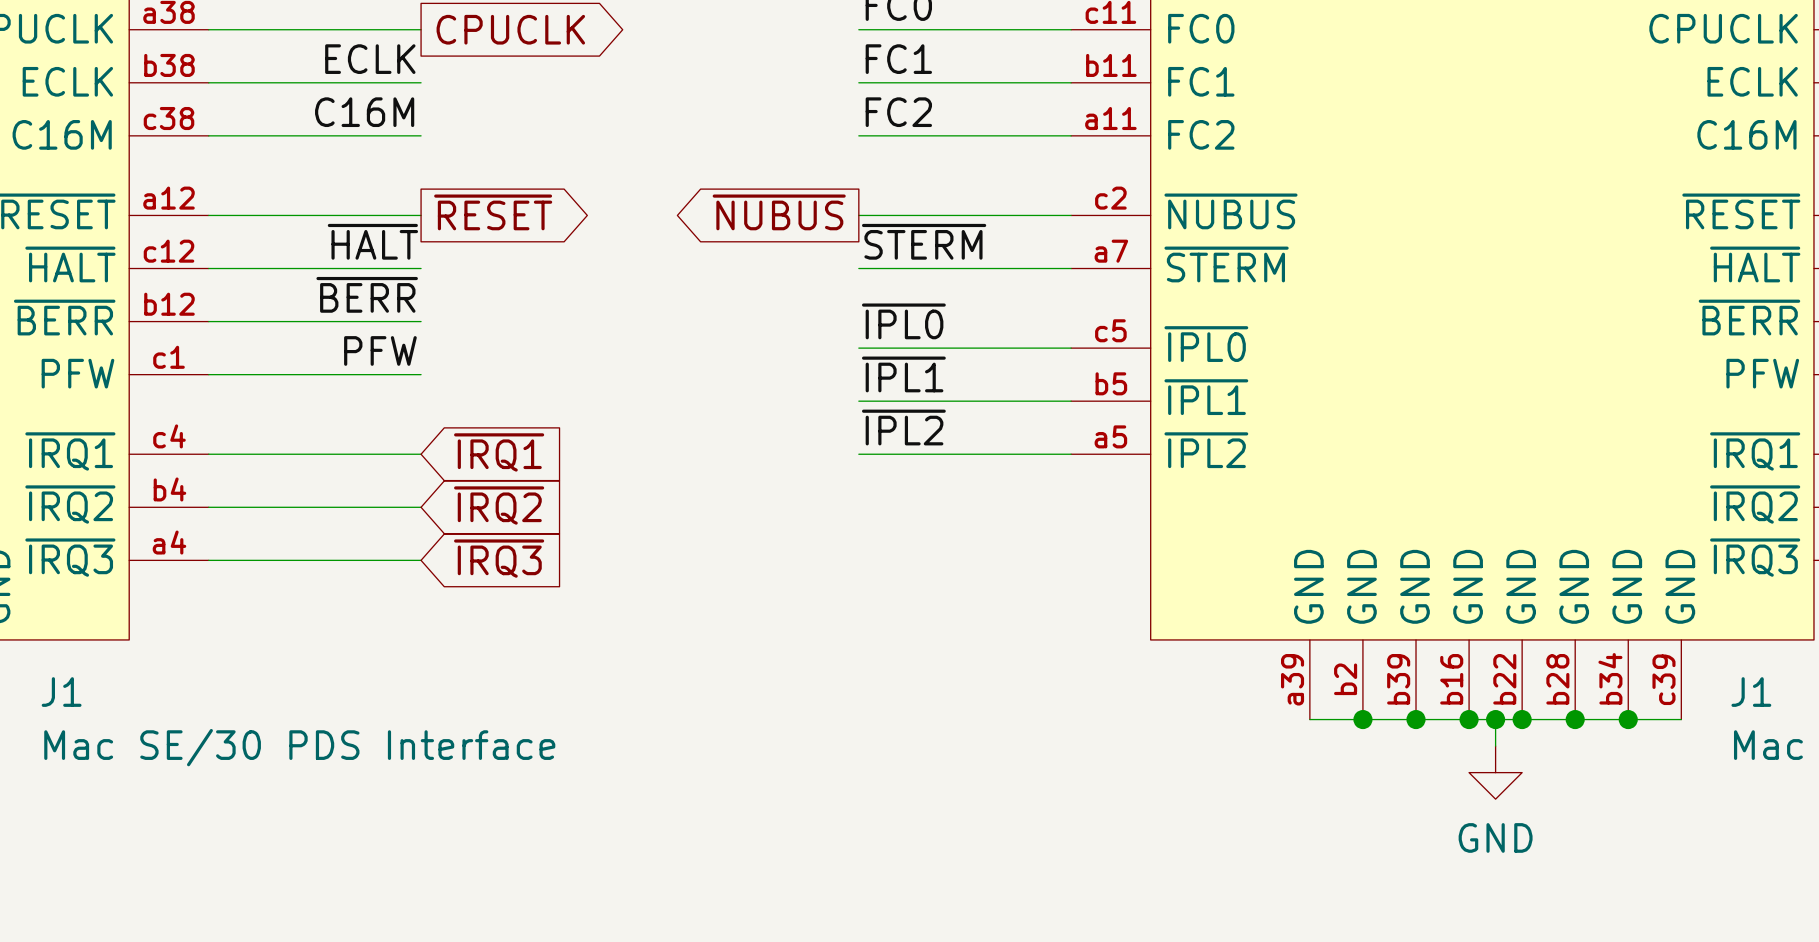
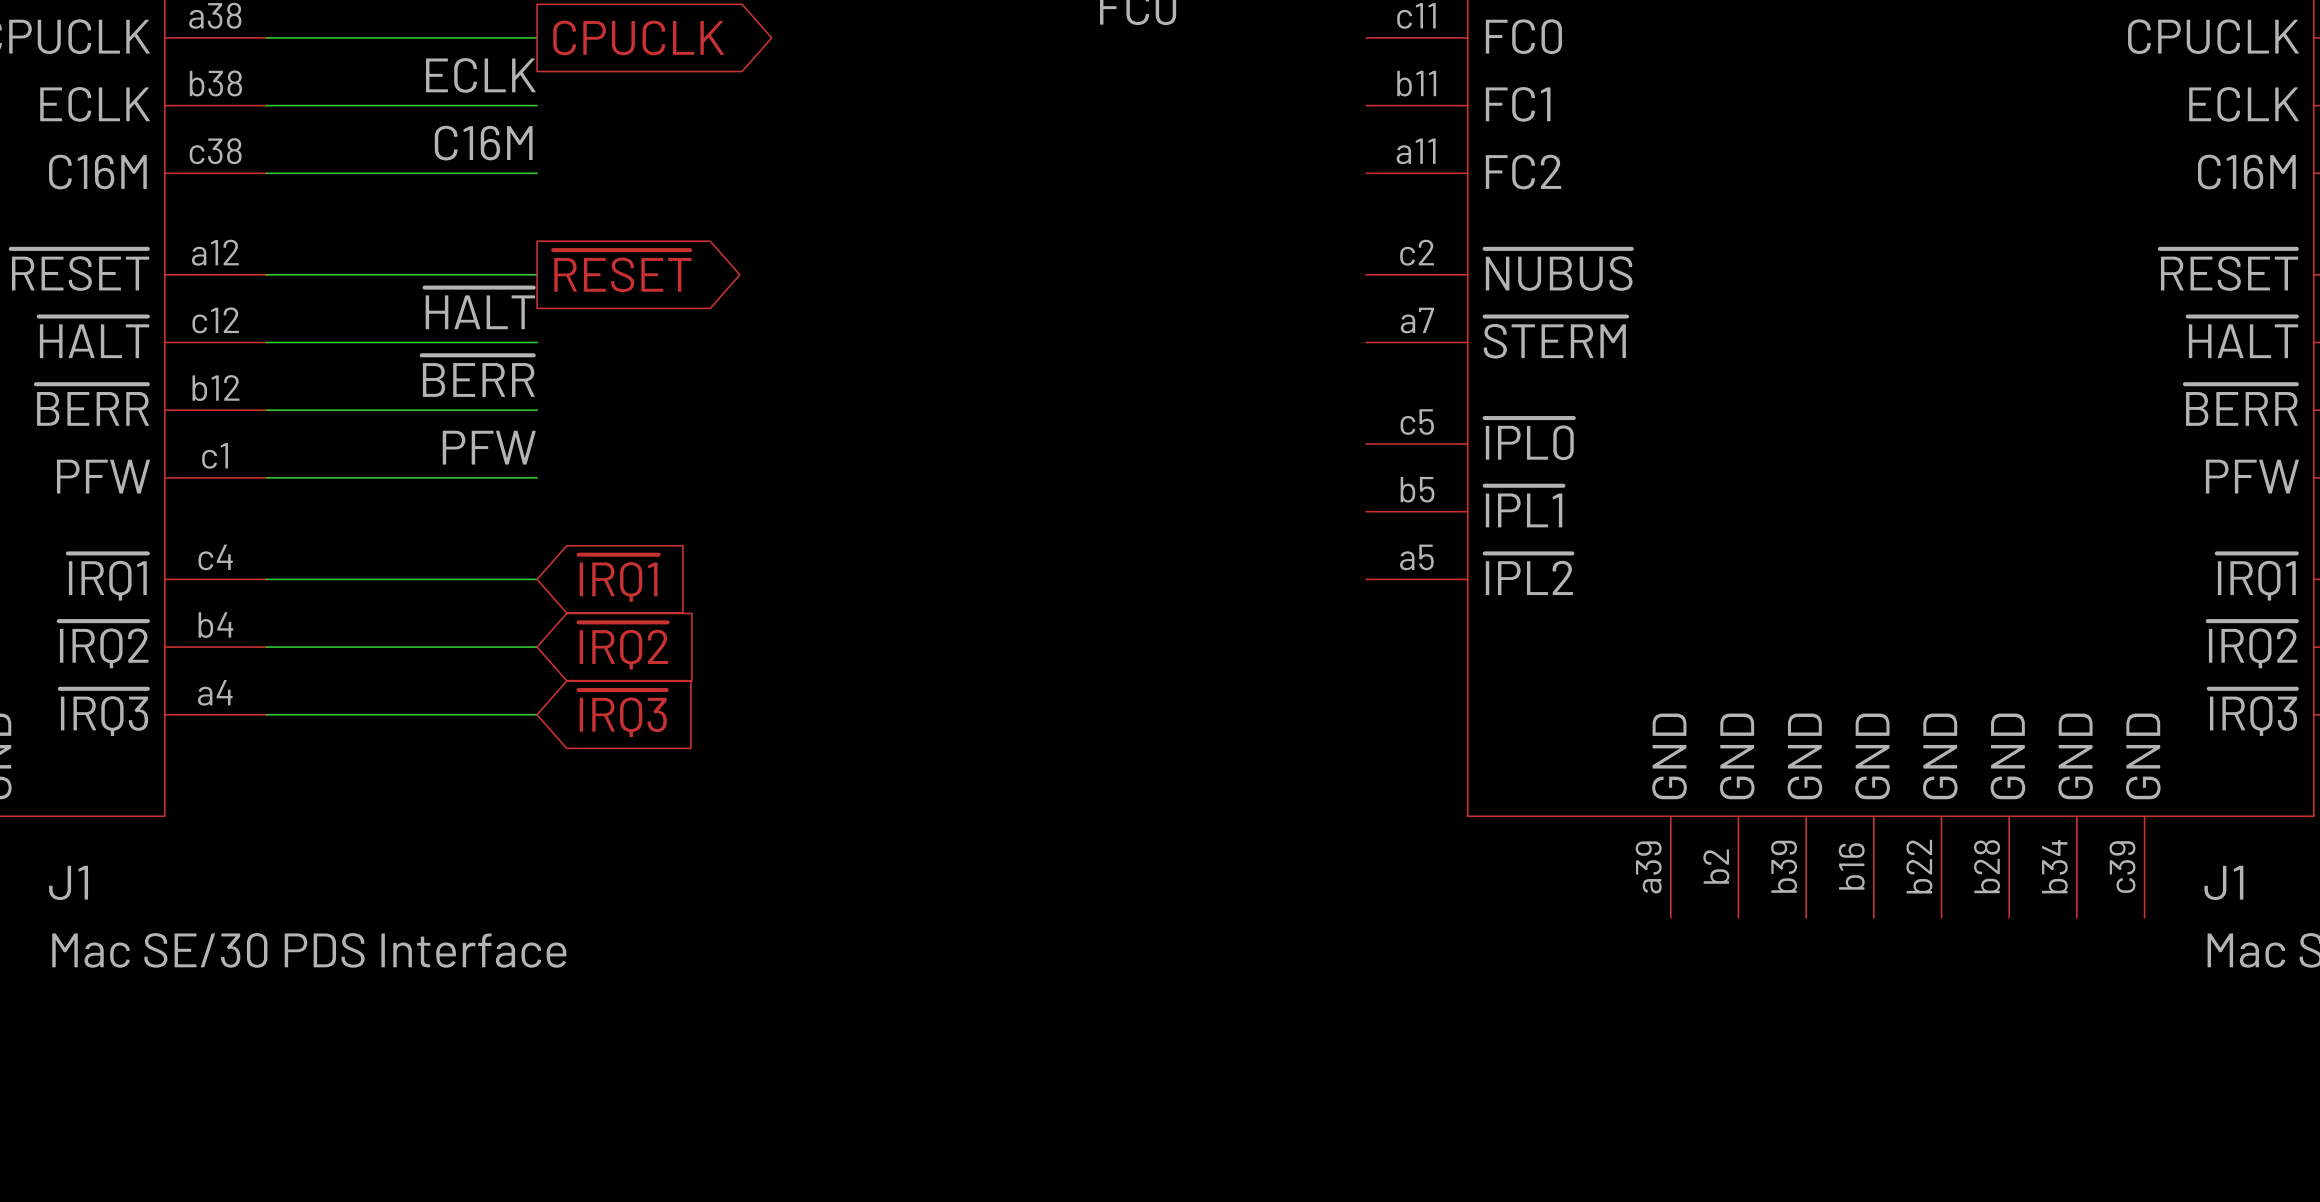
wire: (858, 29) (1071, 29) -> none
label: FC1 (898, 59) -> none
wire: (858, 82) (1071, 82) -> none
label: FC2 (898, 112) -> none
wire: (858, 135) (1071, 135) -> none
global label: ~{NUBUS} (779, 212) -> none
wire: (858, 215) (1071, 215) -> none
label: ~{STERM} (924, 241) -> none
wire: (858, 268) (1071, 268) -> none
label: ~{IPL0} (903, 321) -> none
wire: (858, 348) (1071, 348) -> none
label: ~{IPL1} (903, 374) -> none
wire: (858, 401) (1071, 401) -> none
label: ~{IPL2} (903, 427) -> none
wire: (858, 454) (1071, 454) -> none
wire: (1309, 719) (1681, 719) -> none
junction: (1362, 719) -> none
junction: (1416, 719) -> none
junction: (1469, 719) -> none
wire: (1495, 719) (1495, 746) -> none
junction: (1495, 719) -> none
junction: (1522, 719) -> none
junction: (1575, 719) -> none
junction: (1628, 719) -> none
power symbol: GND (1495, 772) -> none

